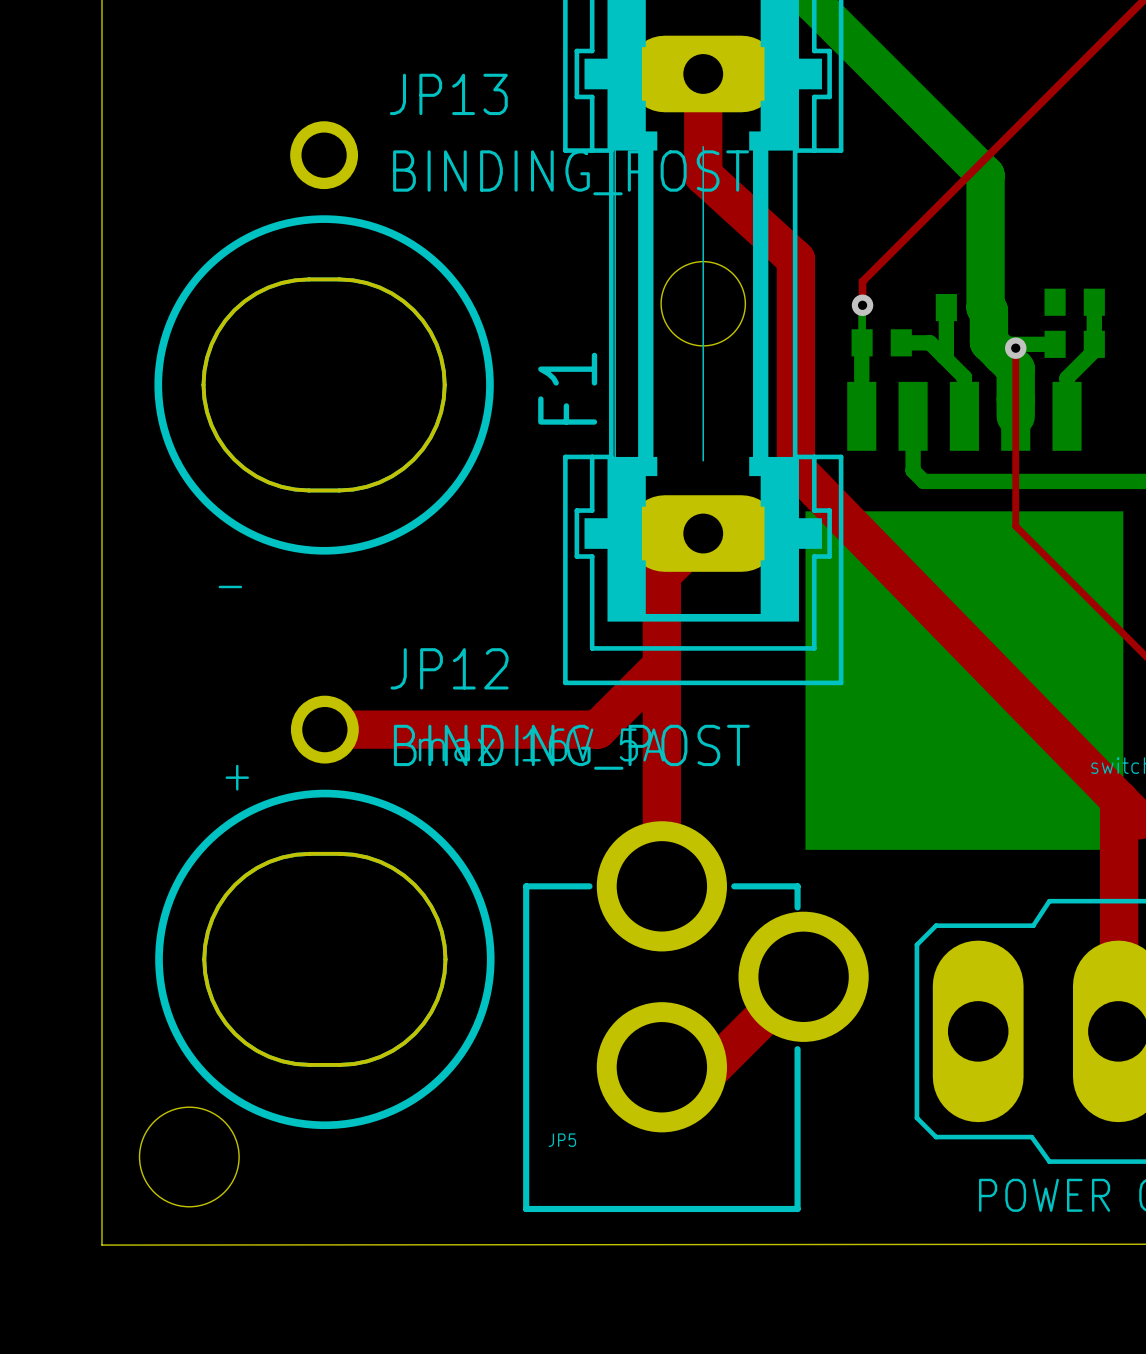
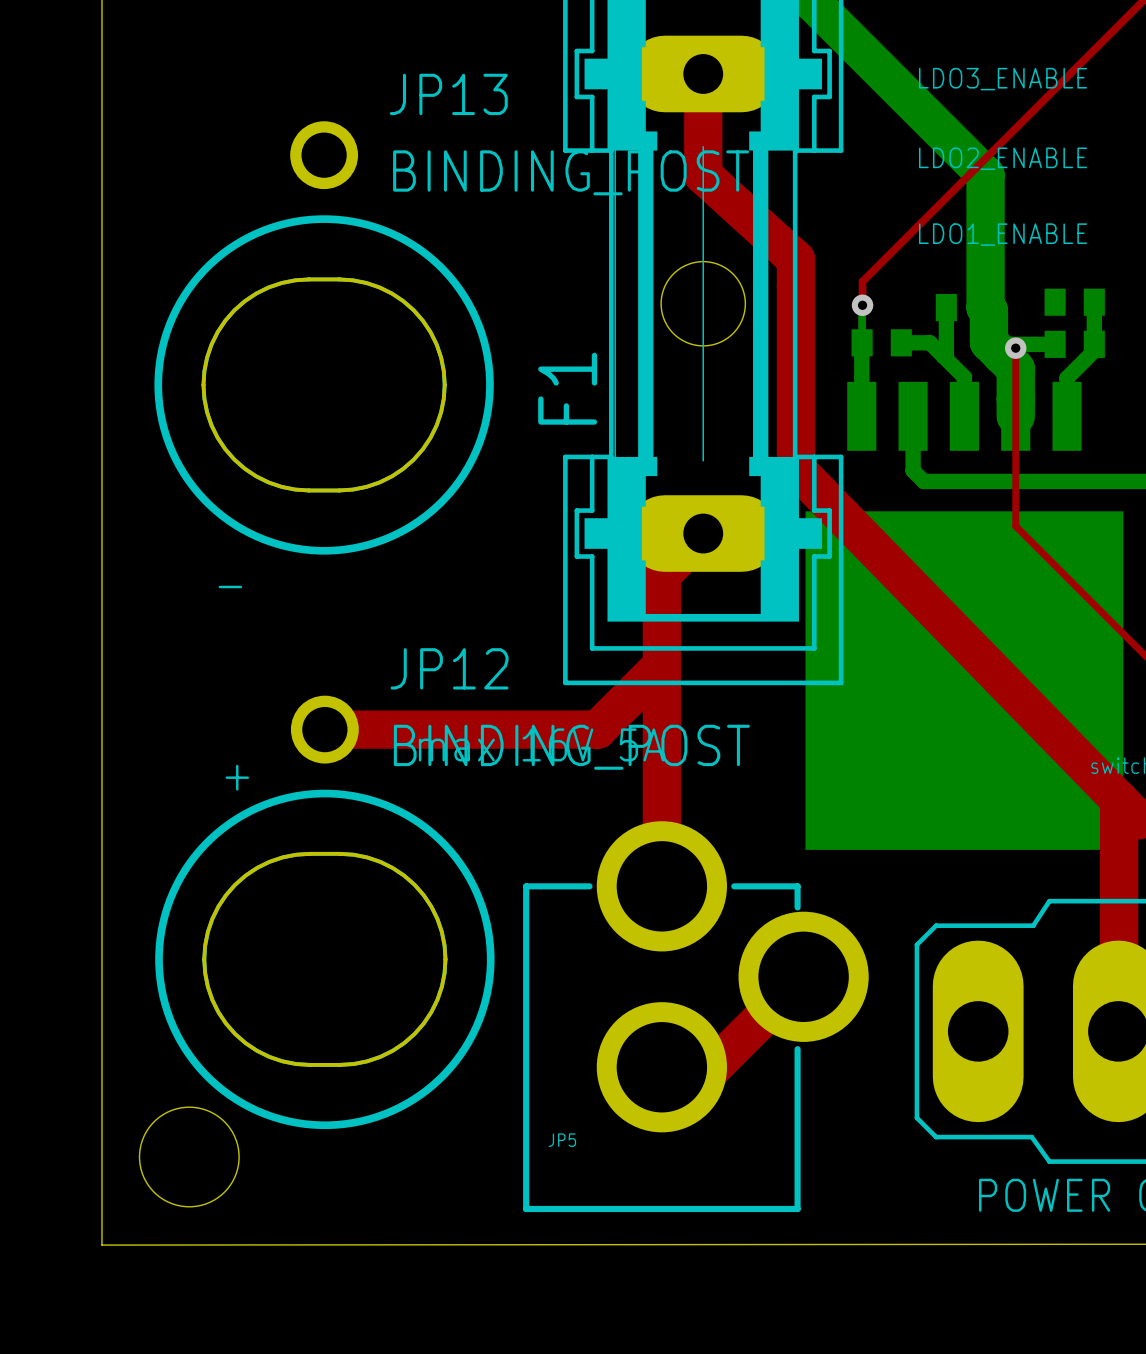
text: none -> LDO3_ENABLE (1003, 79)
text: none -> LDO2_ENABLE (1003, 158)
text: none -> LDO1_ENABLE (1003, 234)

